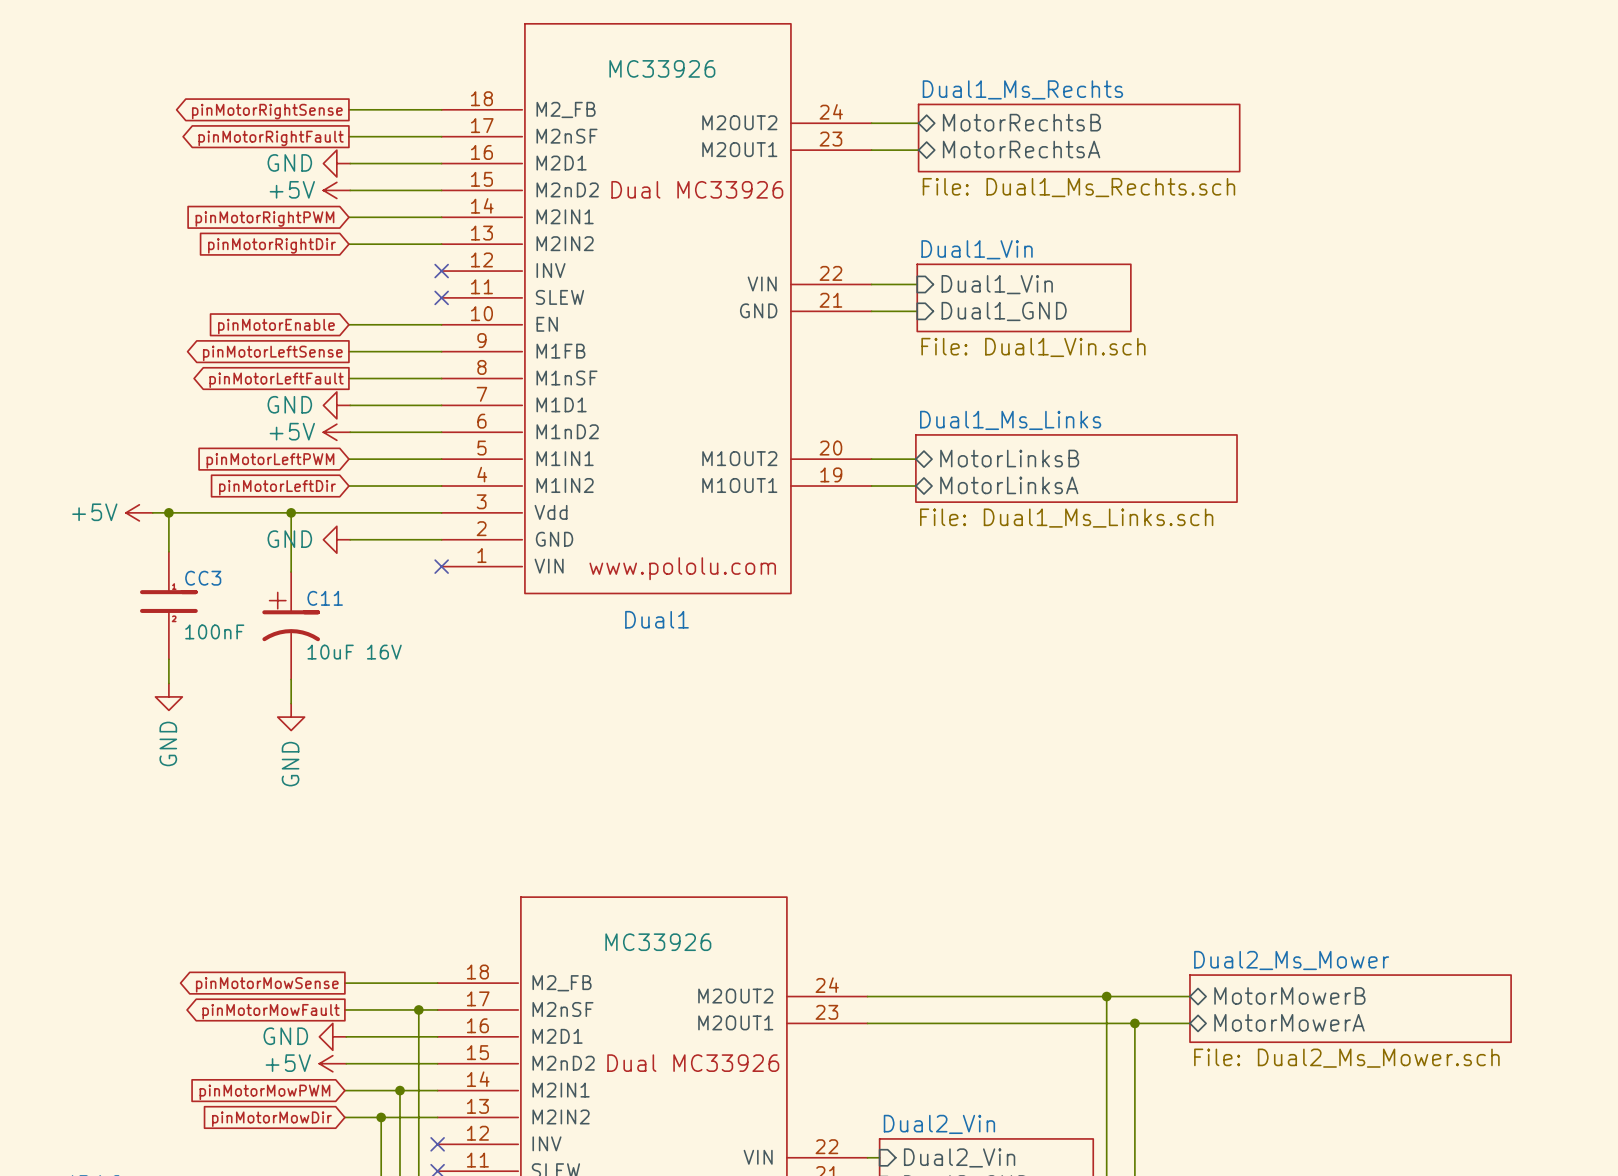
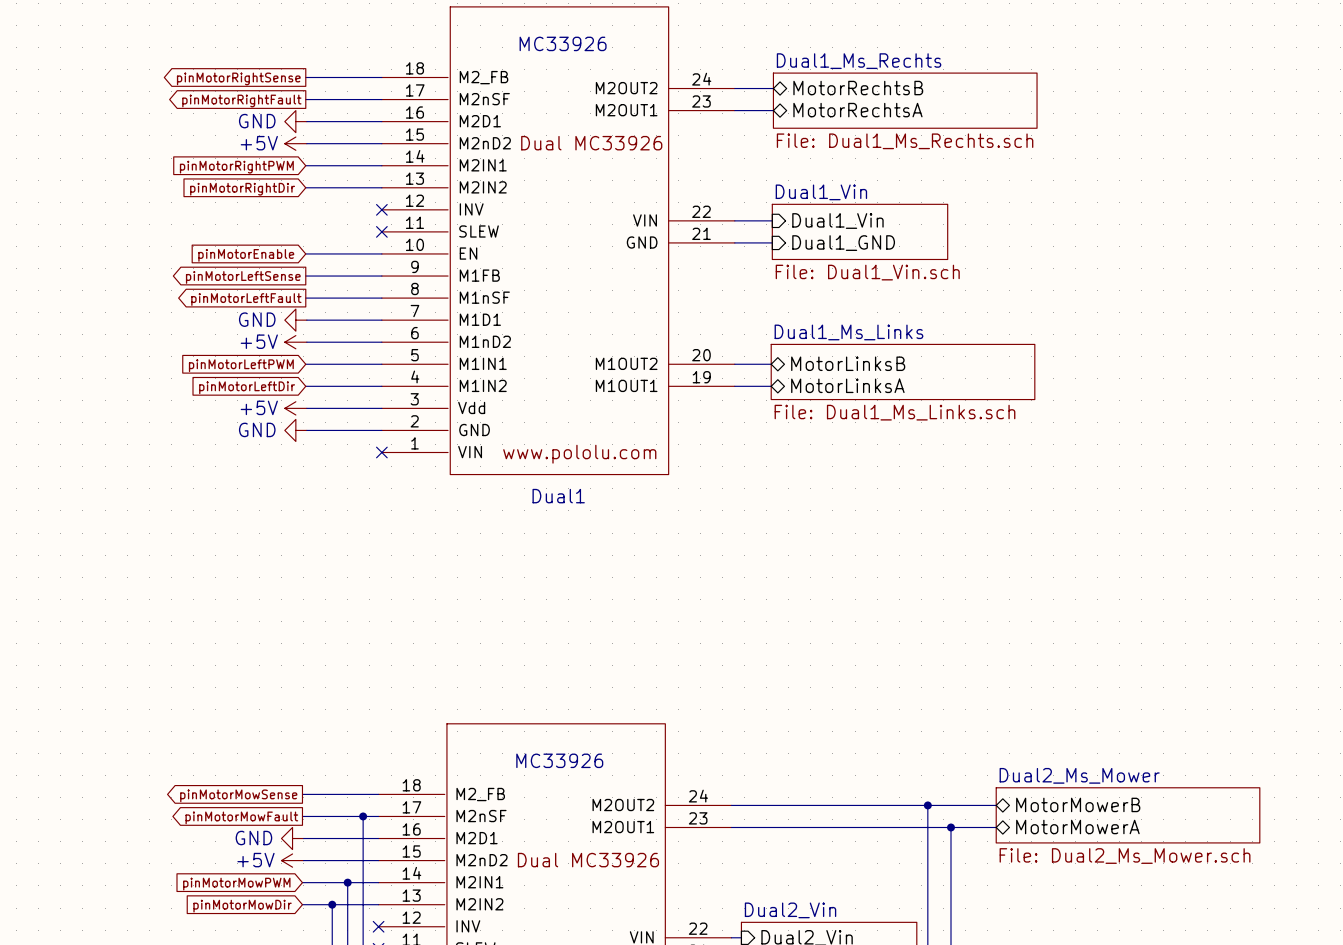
power symbol position: +5V (139, 512) -> +5V (295, 408)
wire: (152, 512) (350, 512) -> none
wire: (168, 512) (168, 551) -> none
junction: (168, 512) -> none
wire: (291, 512) (291, 571) -> none
junction: (291, 512) -> none
CC3: 100nF (168, 605) -> none
C11: 10uF 16V (291, 625) -> none
wire: (168, 659) (168, 683) -> none
wire: (291, 679) (291, 703) -> none
power symbol: GND (168, 696) -> none
power symbol: GND (291, 717) -> none

